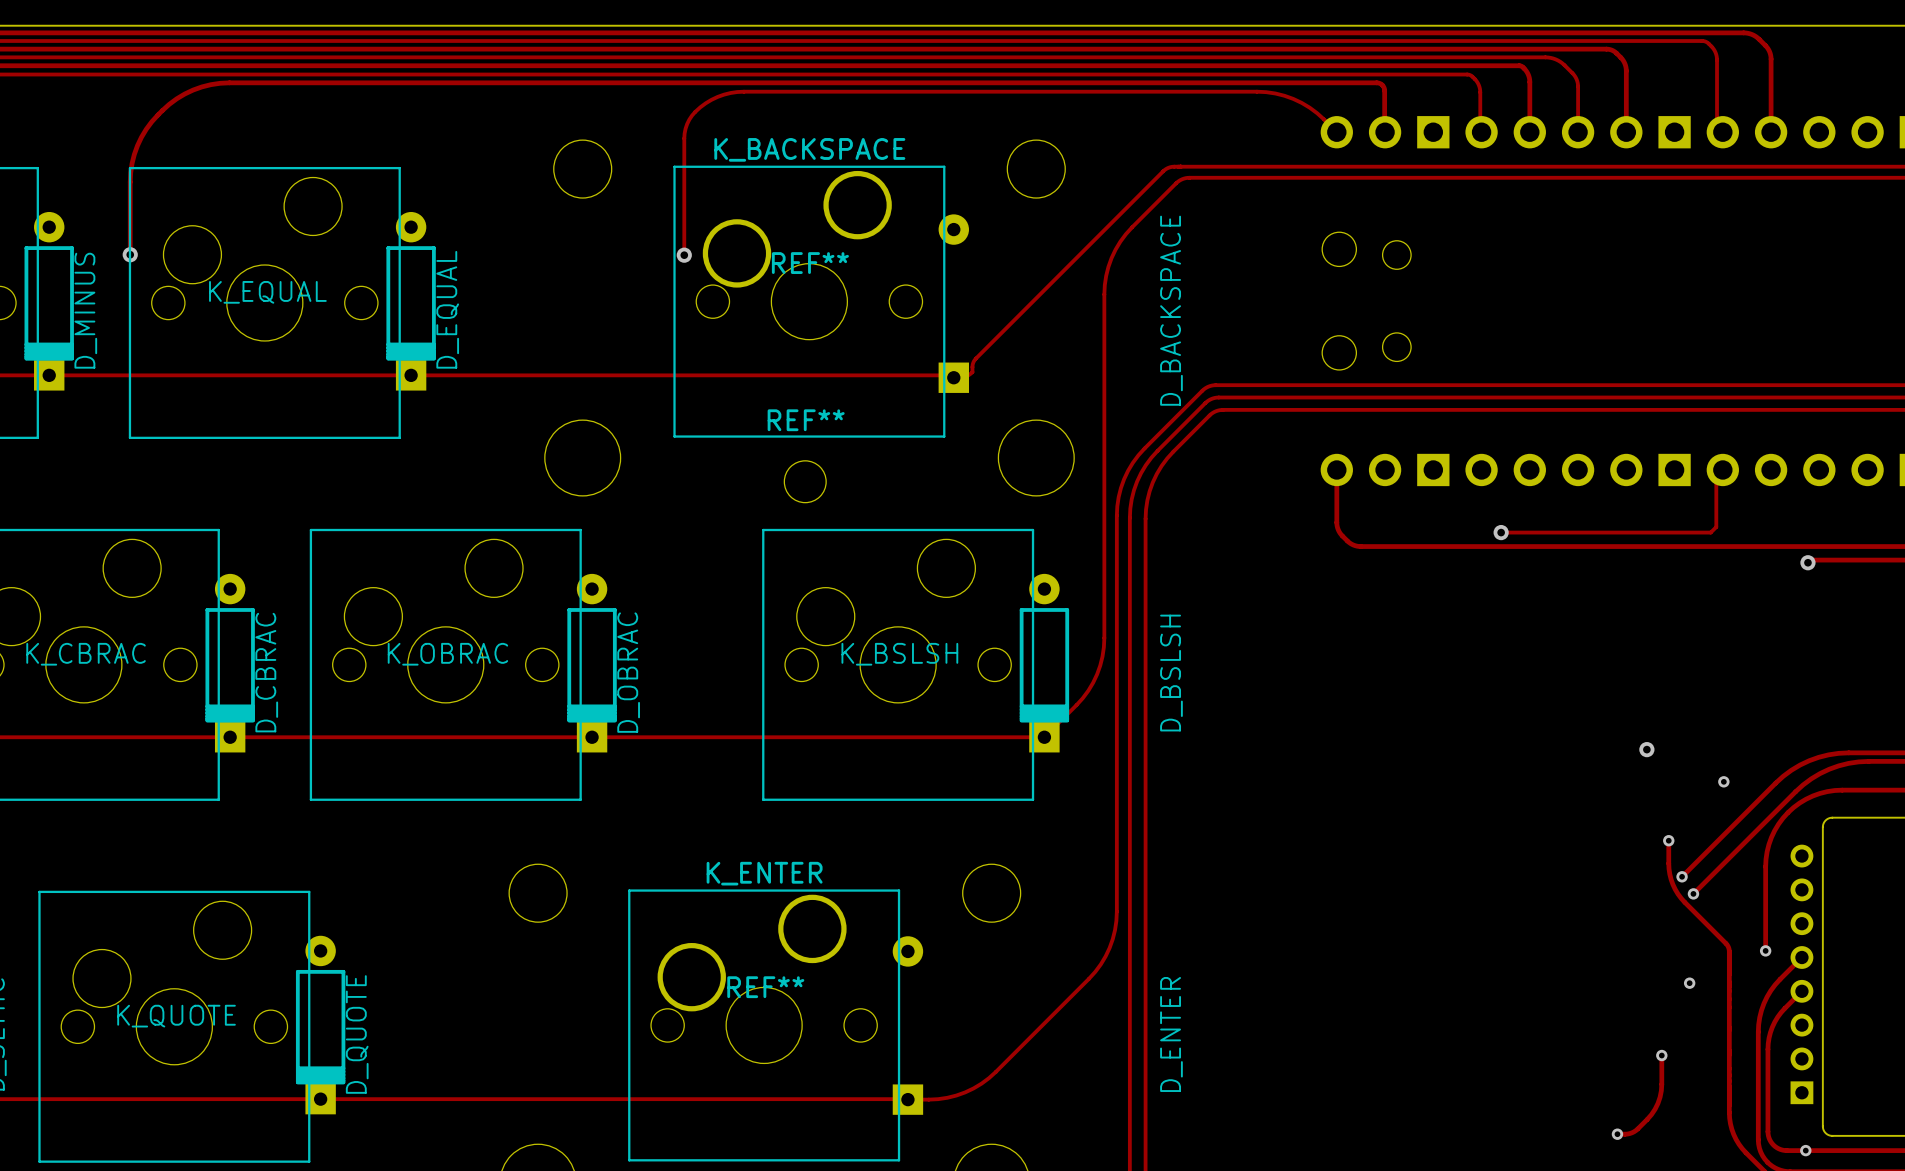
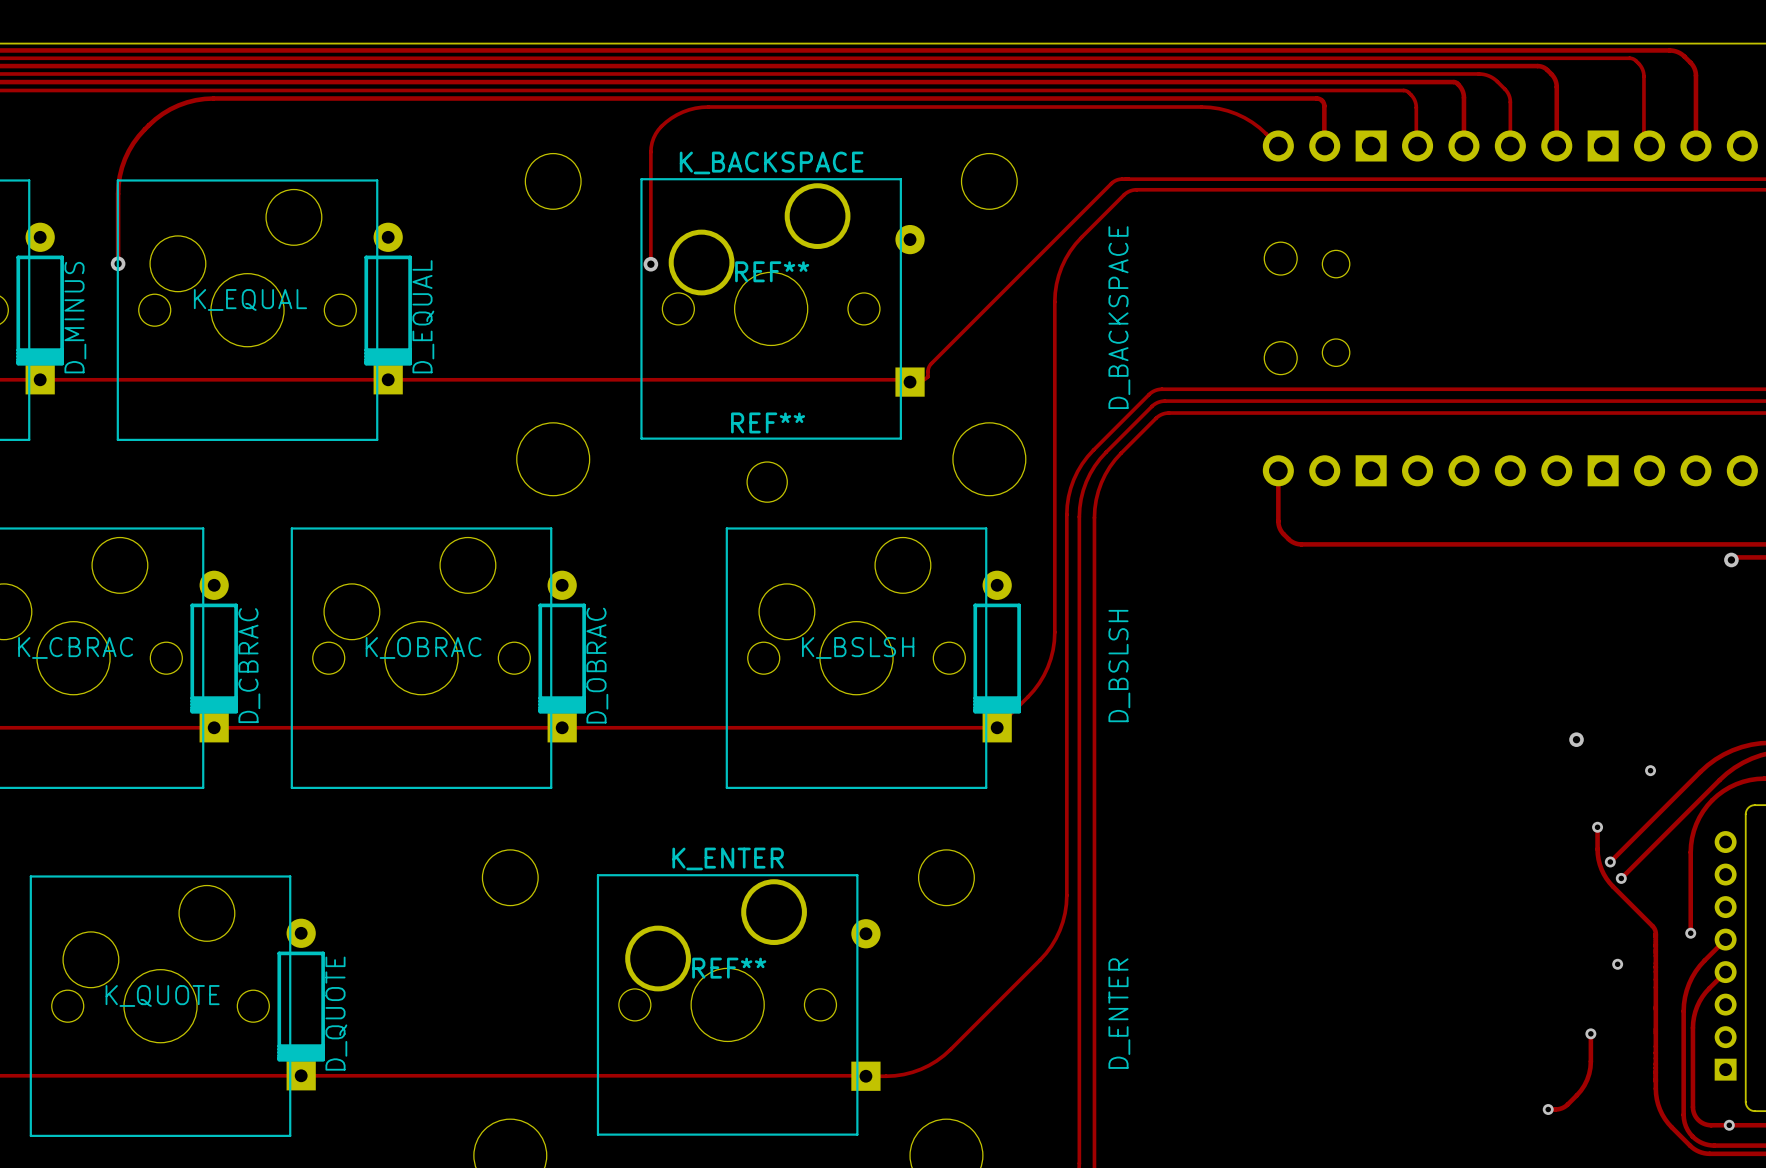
track: (1722, 469) (1716, 476) (1716, 527) (1710, 532) (1501, 532) -> none
via: (1501, 532) -> none

